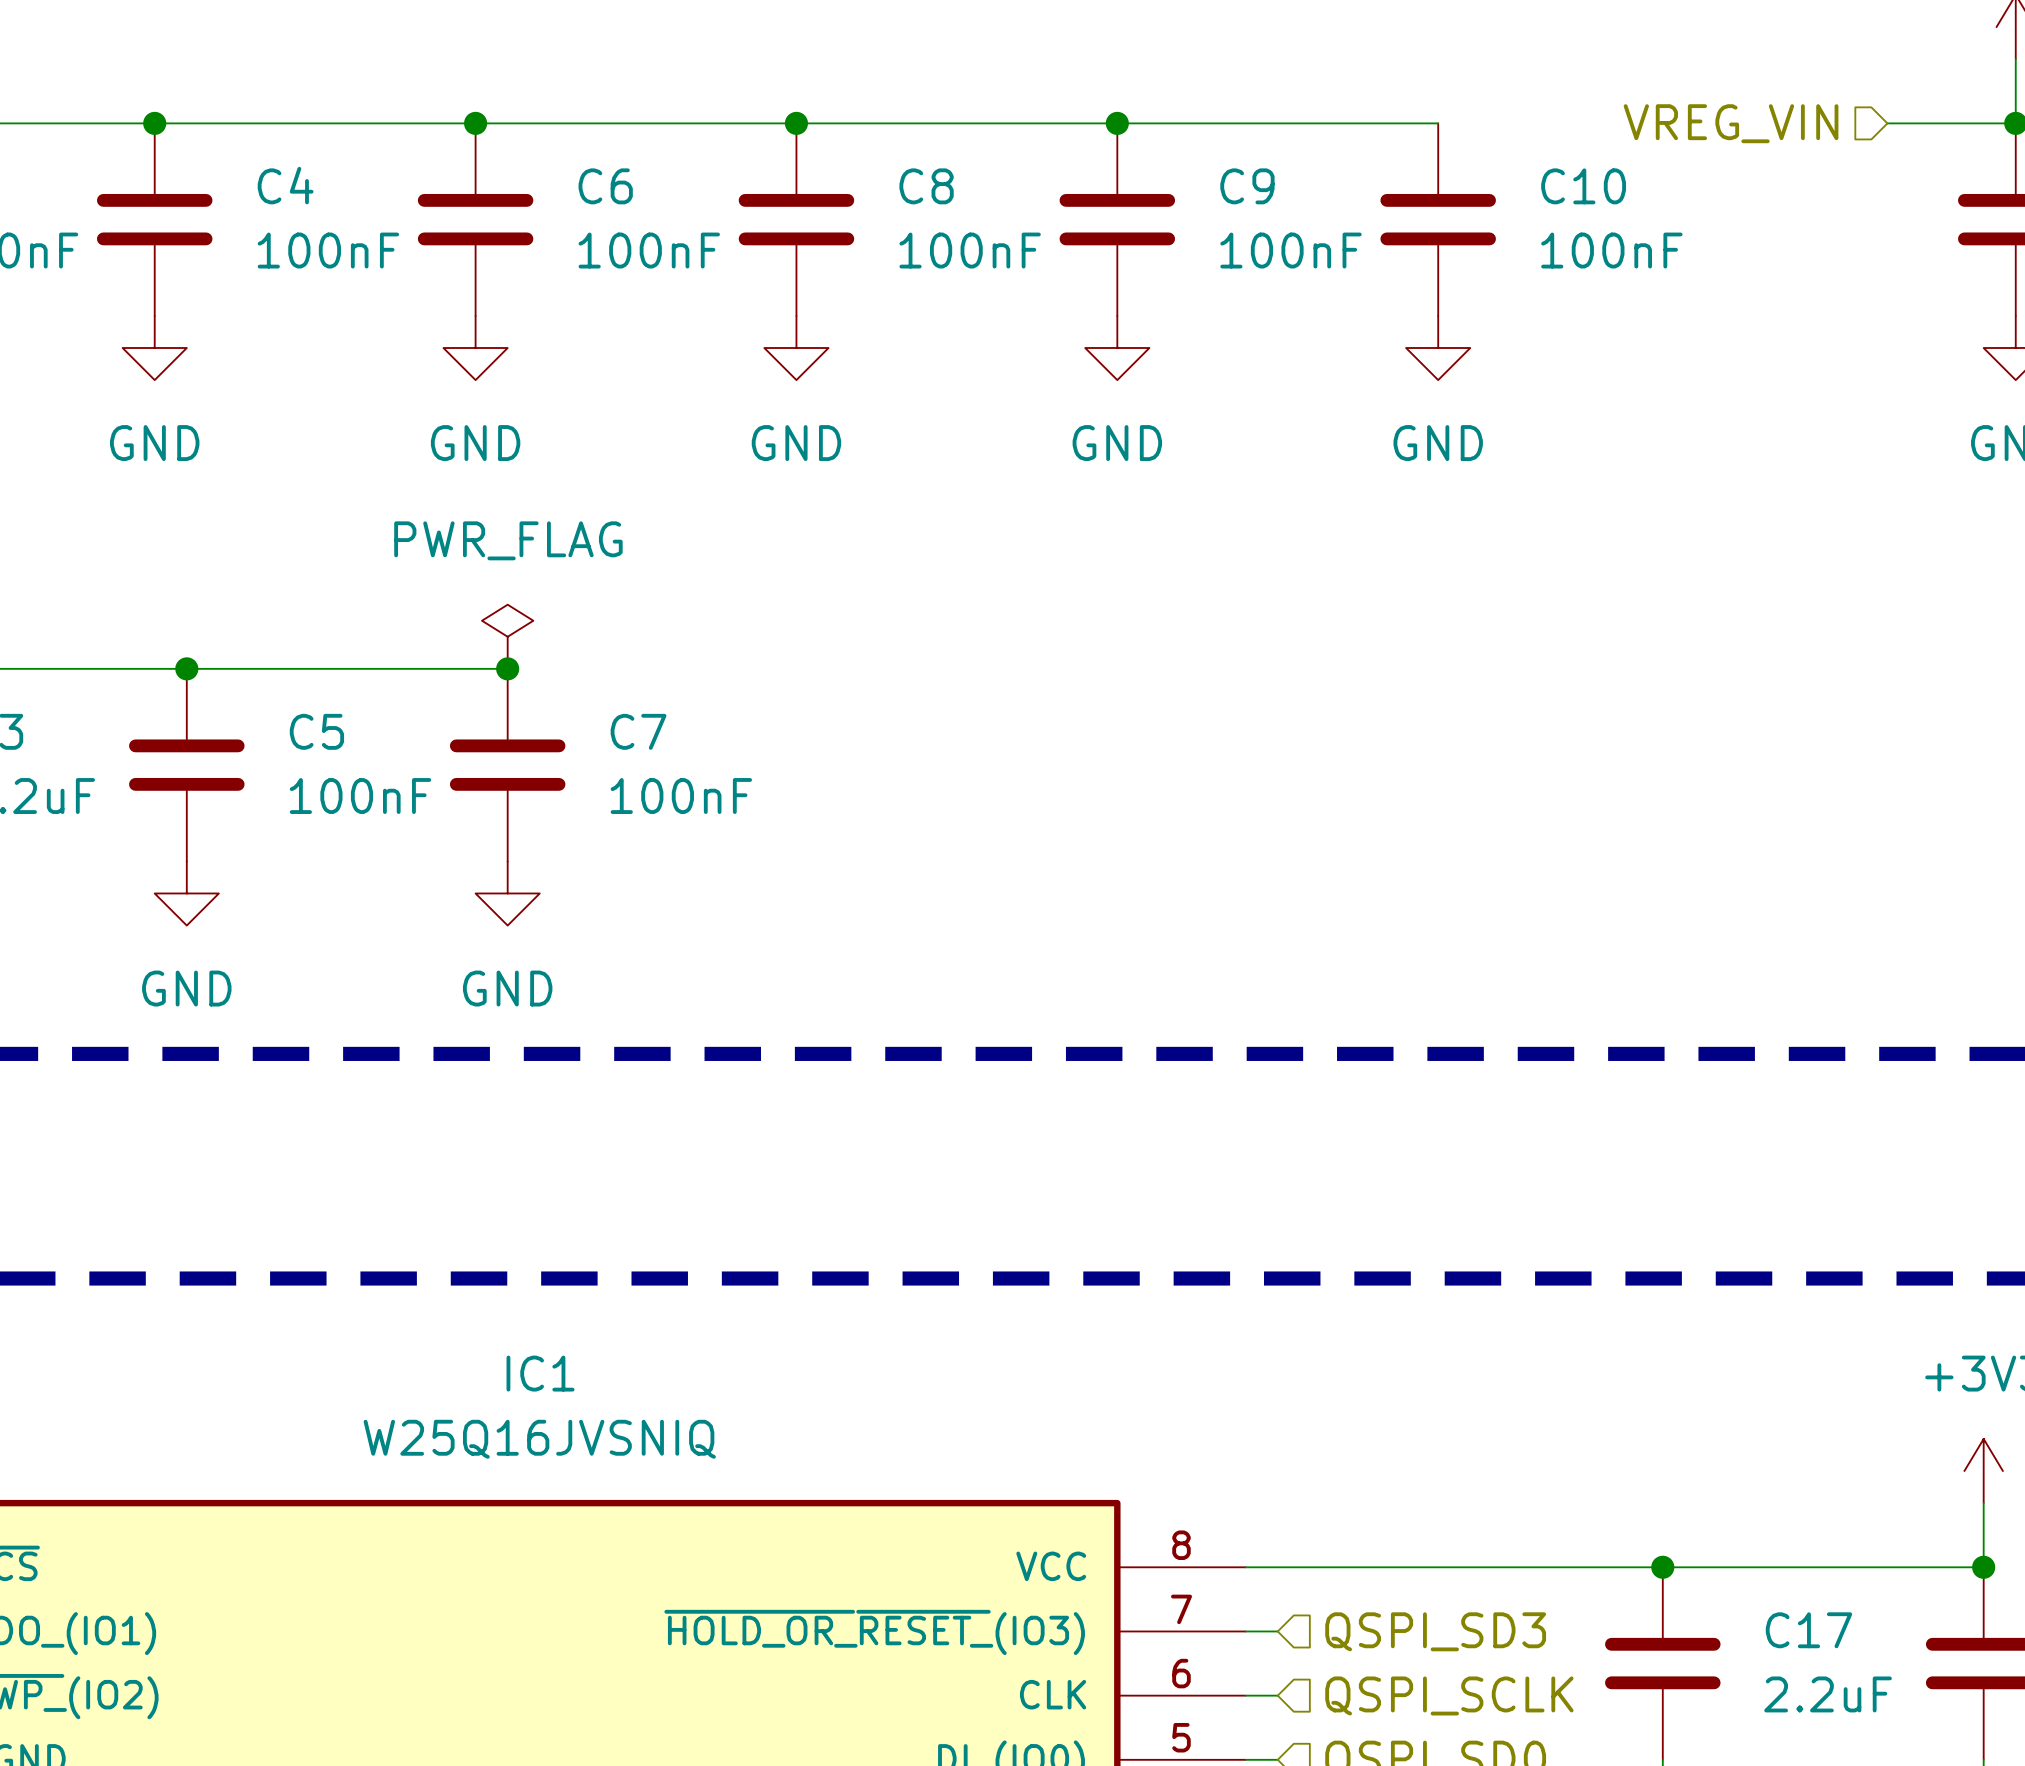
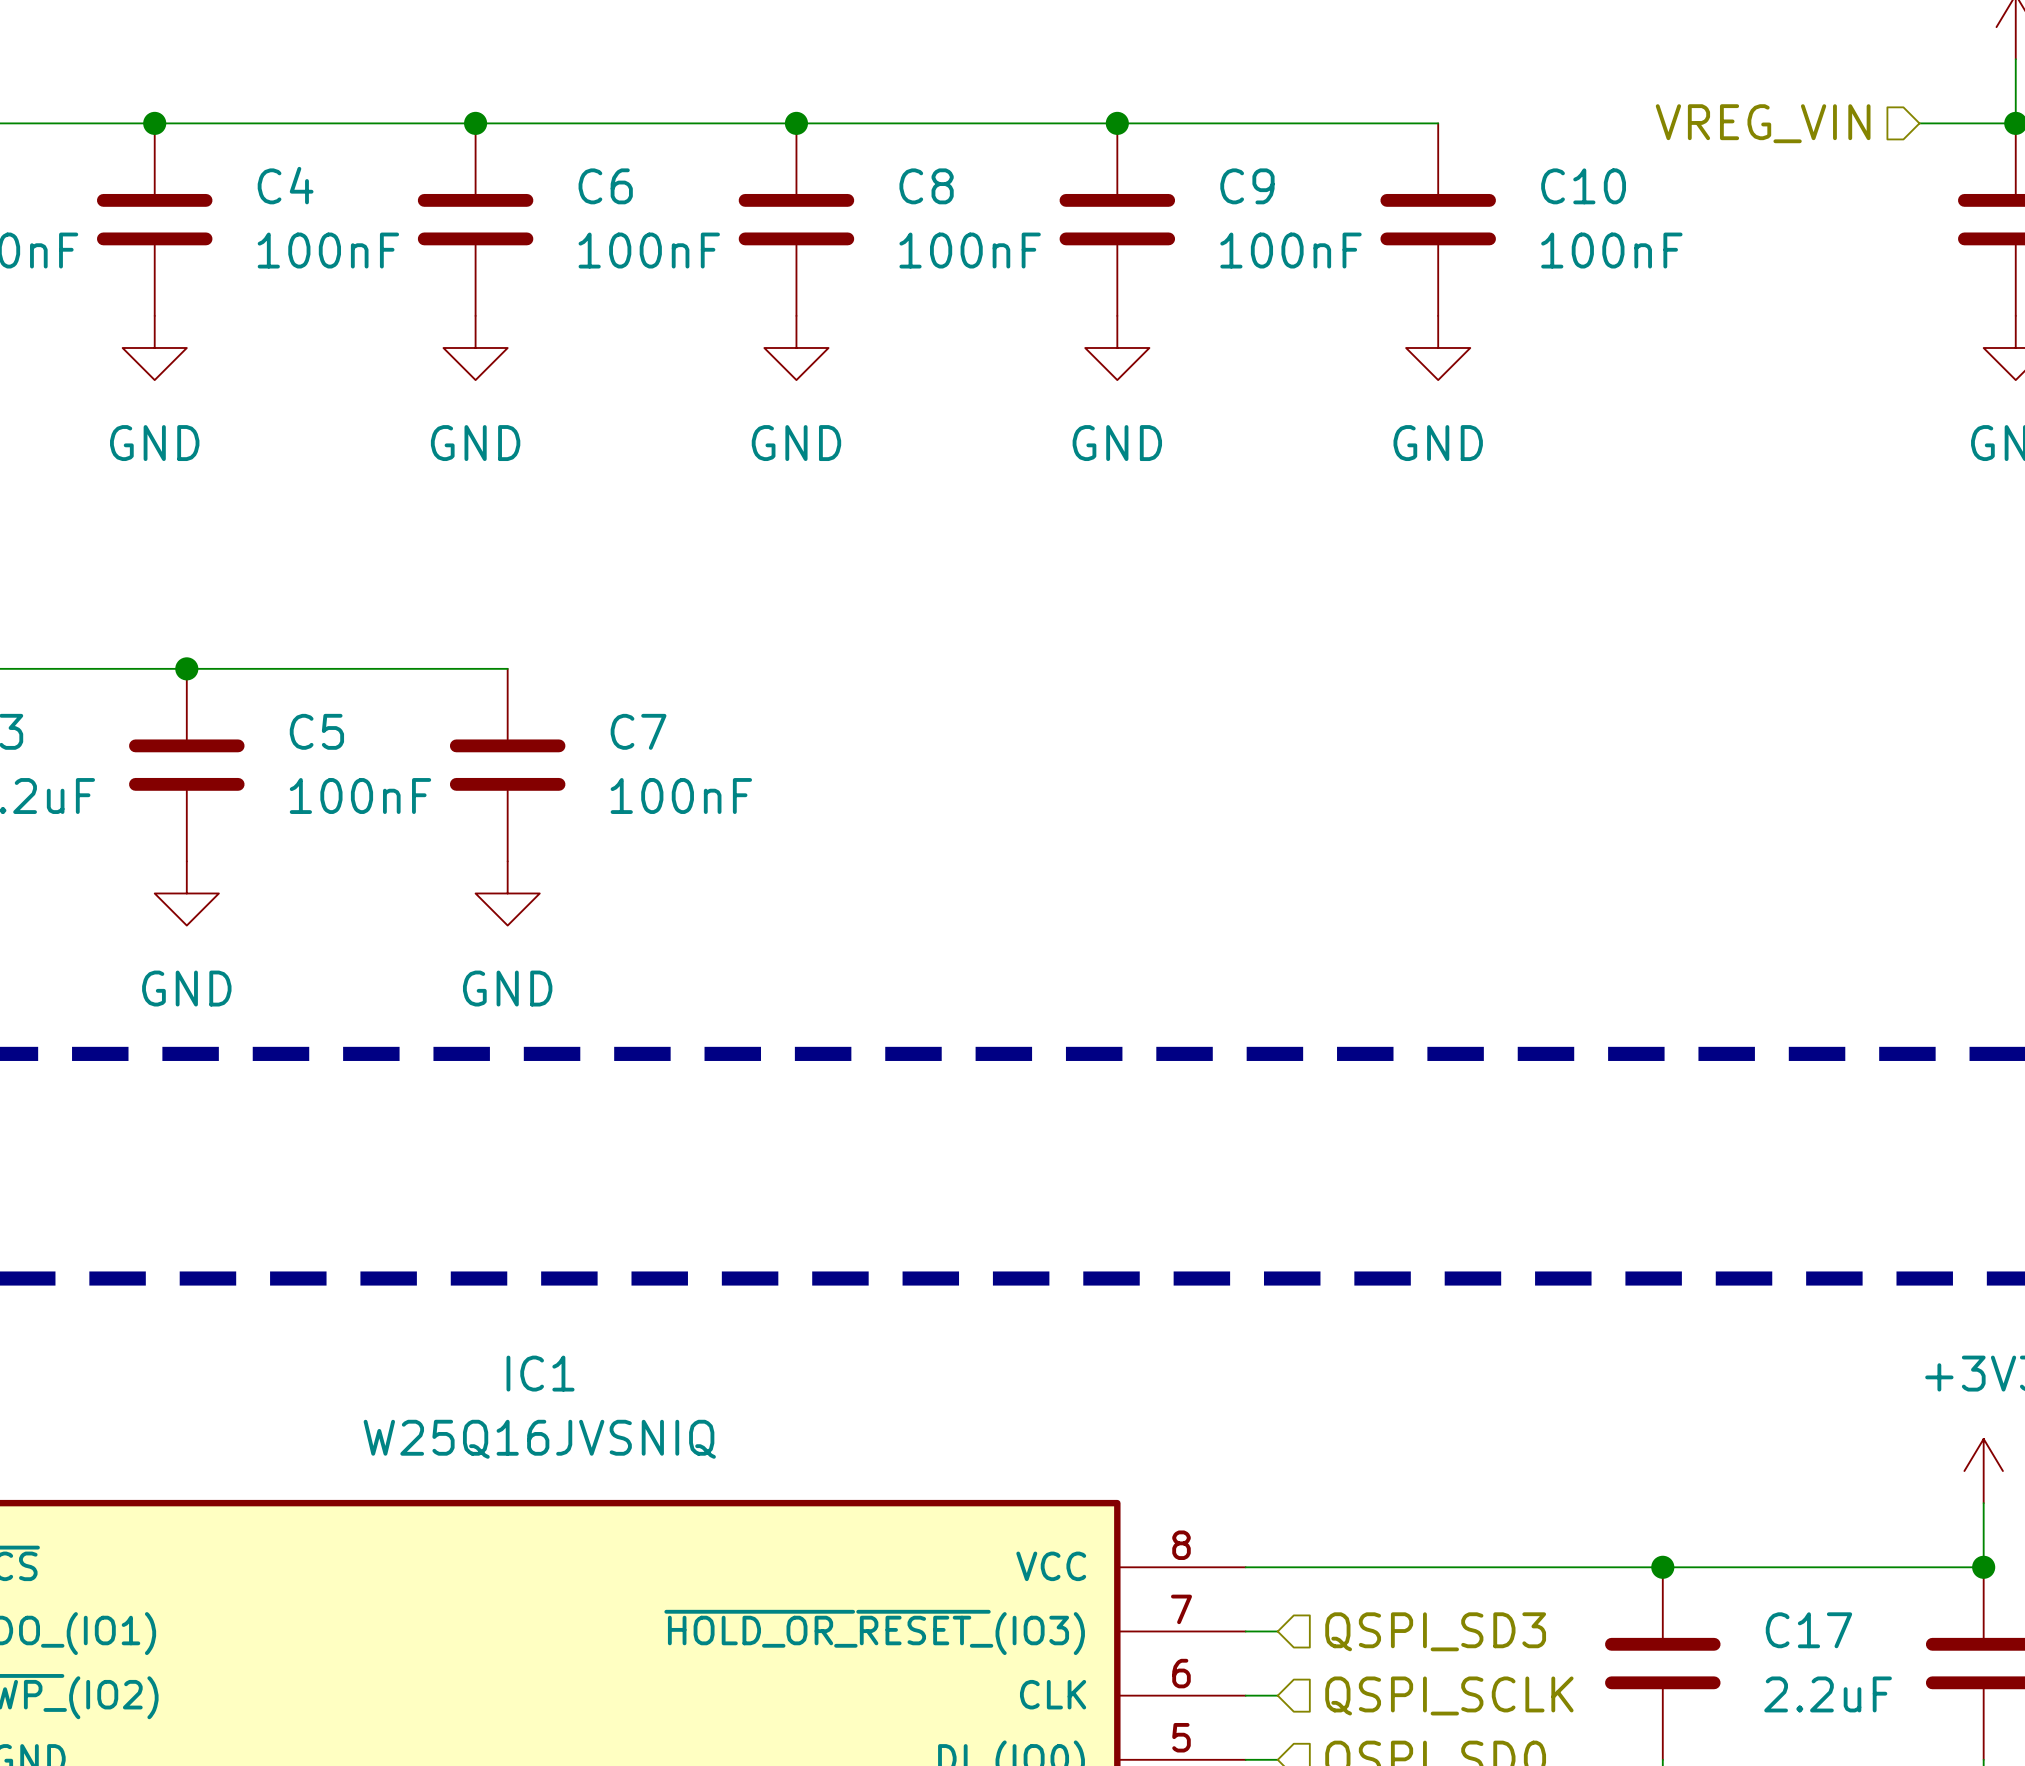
hierarchical label position: VREG_VIN (1731, 123) -> VREG_VIN (1763, 123)
wire: (1887, 123) (1919, 123) -> none
power symbol: PWR_FLAG (507, 636) -> none
junction: (507, 668) -> none

